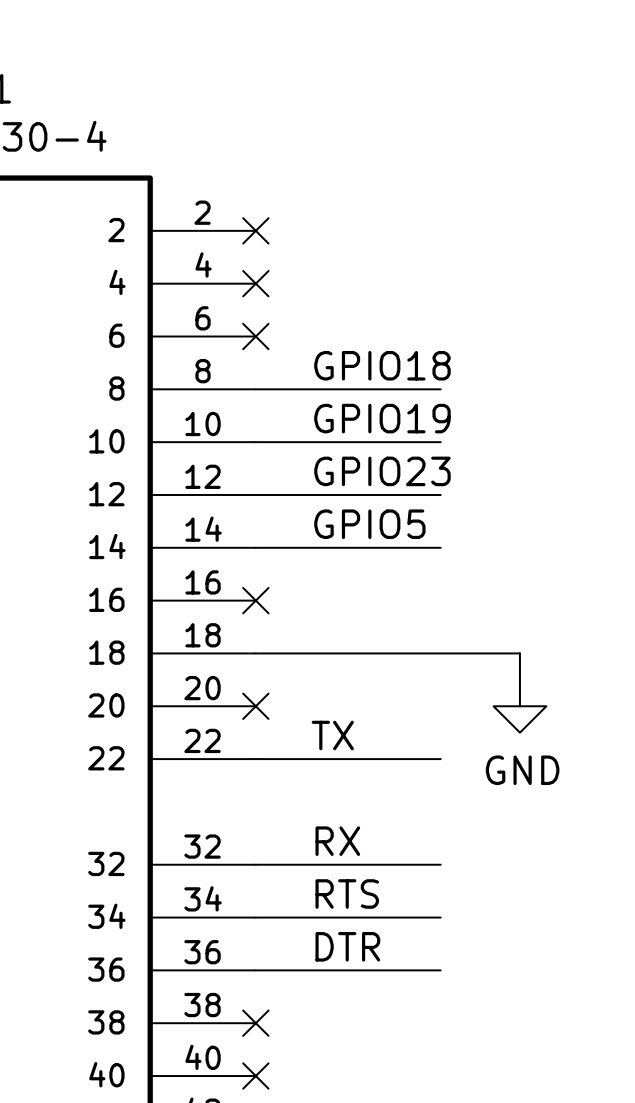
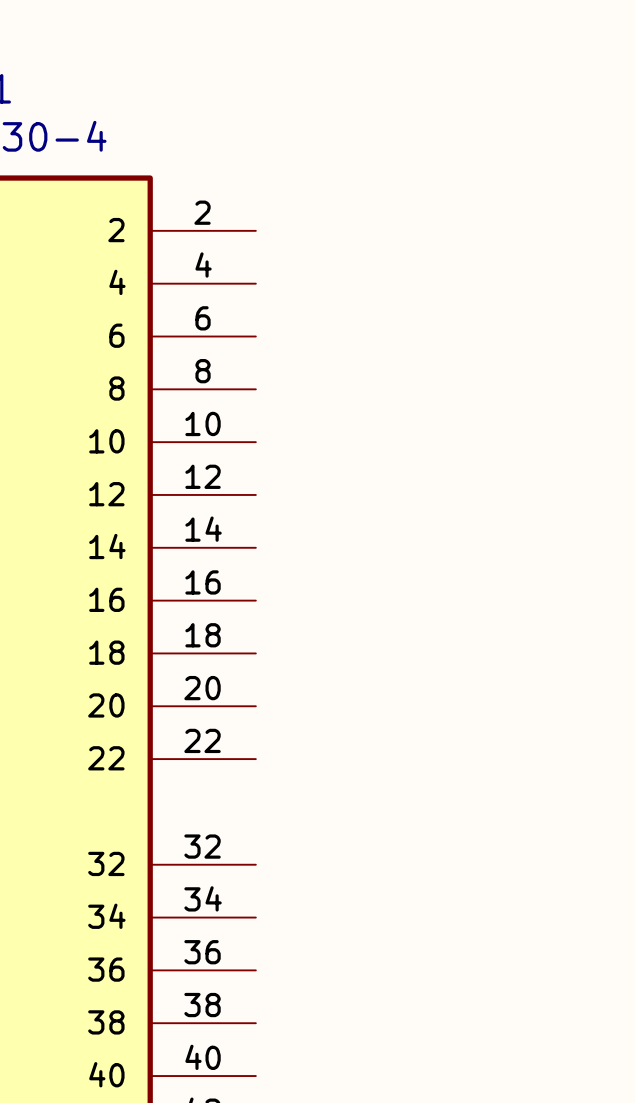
no-connect mark: (255, 230) -> none
no-connect mark: (255, 283) -> none
no-connect mark: (255, 336) -> none
label: GPIO18 (382, 365) -> none
wire: (255, 389) (440, 389) -> none
label: GPIO19 (382, 418) -> none
wire: (255, 442) (440, 442) -> none
label: GPIO23 (382, 471) -> none
wire: (255, 494) (440, 494) -> none
label: GPIO5 (369, 524) -> none
wire: (255, 547) (440, 547) -> none
no-connect mark: (255, 600) -> none
wire: (255, 653) (519, 653) (519, 679) -> none
no-connect mark: (255, 706) -> none
power symbol: GND (519, 706) -> none
label: TX (332, 735) -> none
wire: (255, 759) (440, 759) -> none
label: RX (337, 841) -> none
wire: (255, 864) (440, 864) -> none
label: RTS (347, 893) -> none
wire: (255, 917) (440, 917) -> none
label: DTR (347, 946) -> none
wire: (255, 970) (440, 970) -> none
no-connect mark: (255, 1023) -> none
no-connect mark: (255, 1076) -> none

